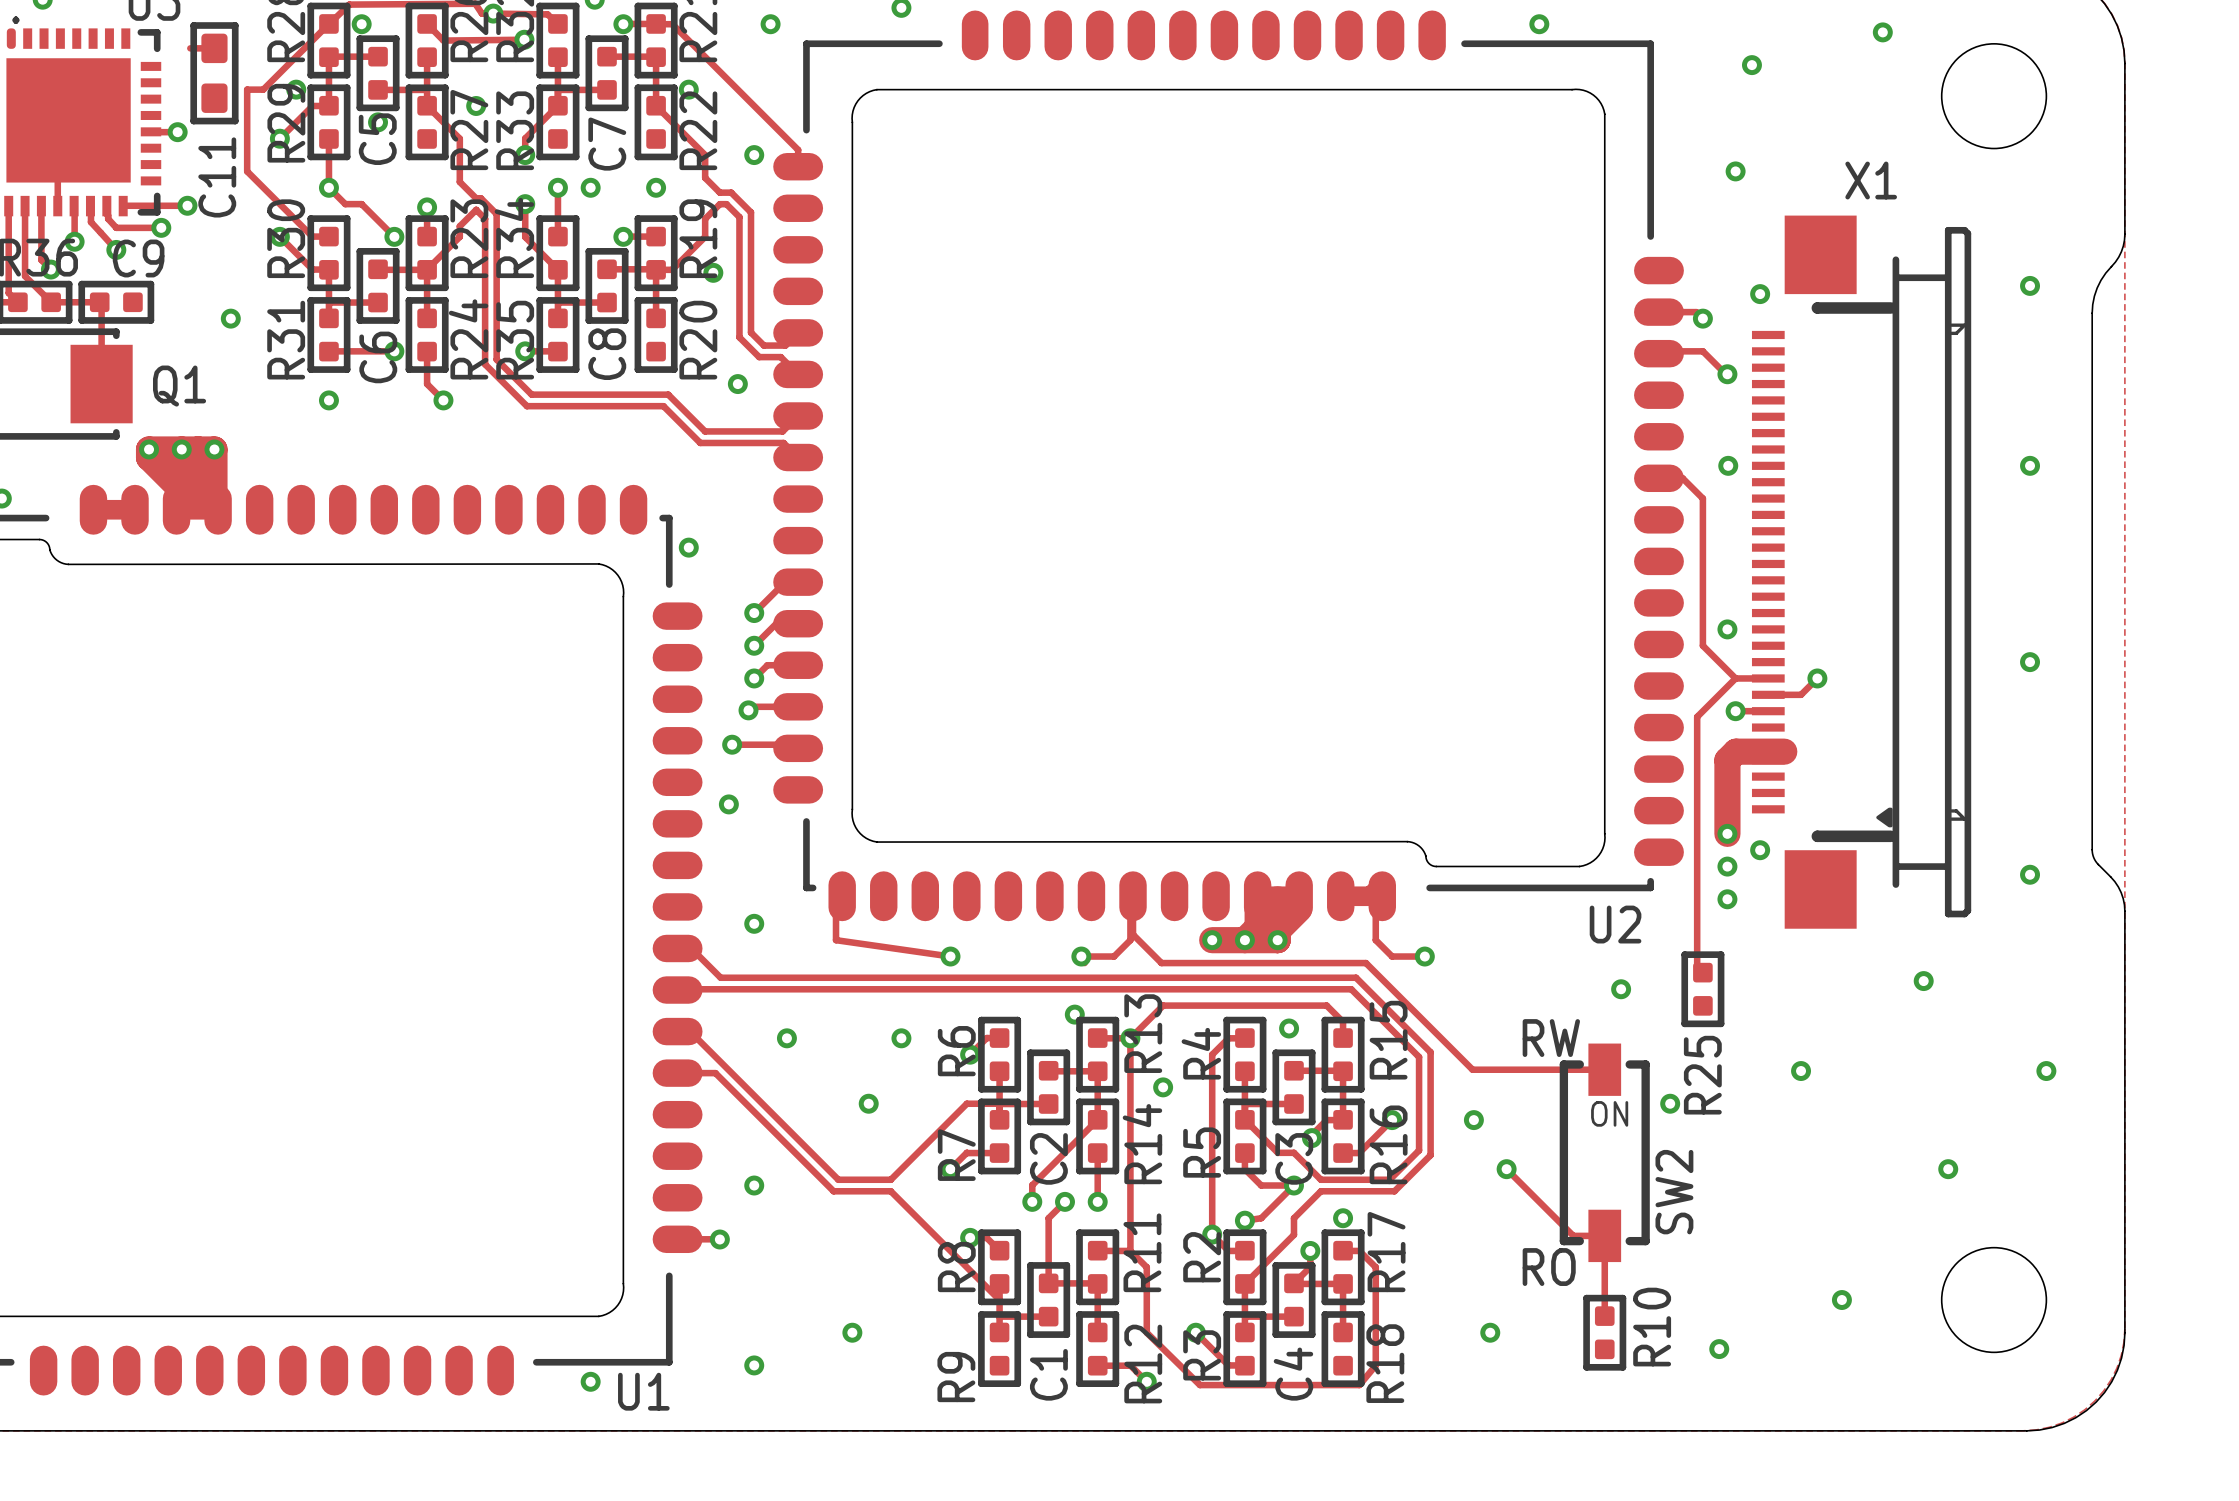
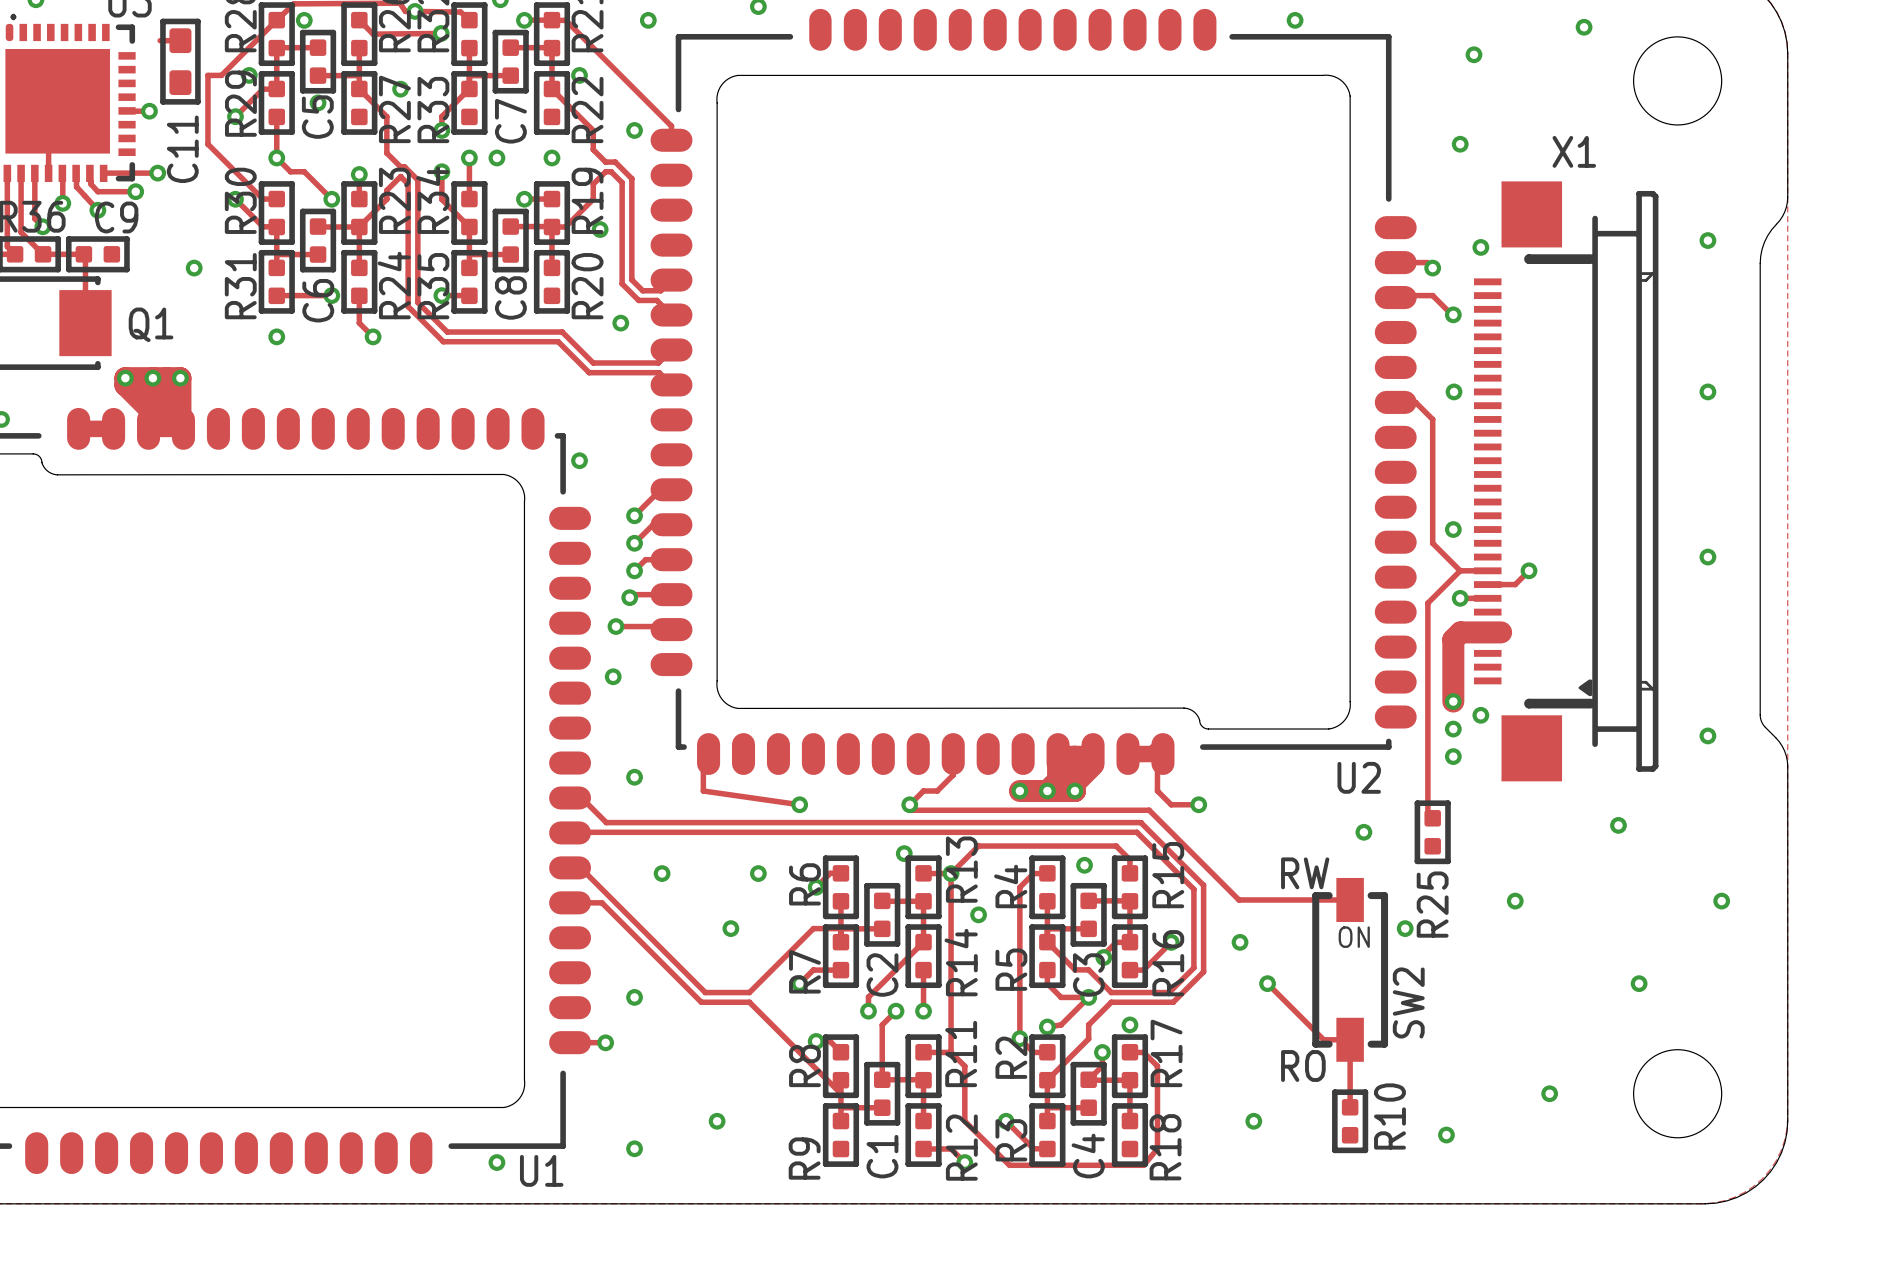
track: (1133, 896) (1130, 898) (1130, 940) (1114, 956) (1081, 956) -> none
track: (1133, 921) (1133, 934) (1161, 963) -> (912, 810) (977, 810)
track: none -> (953, 775) (937, 790) (923, 790) (909, 804) (907, 804)

